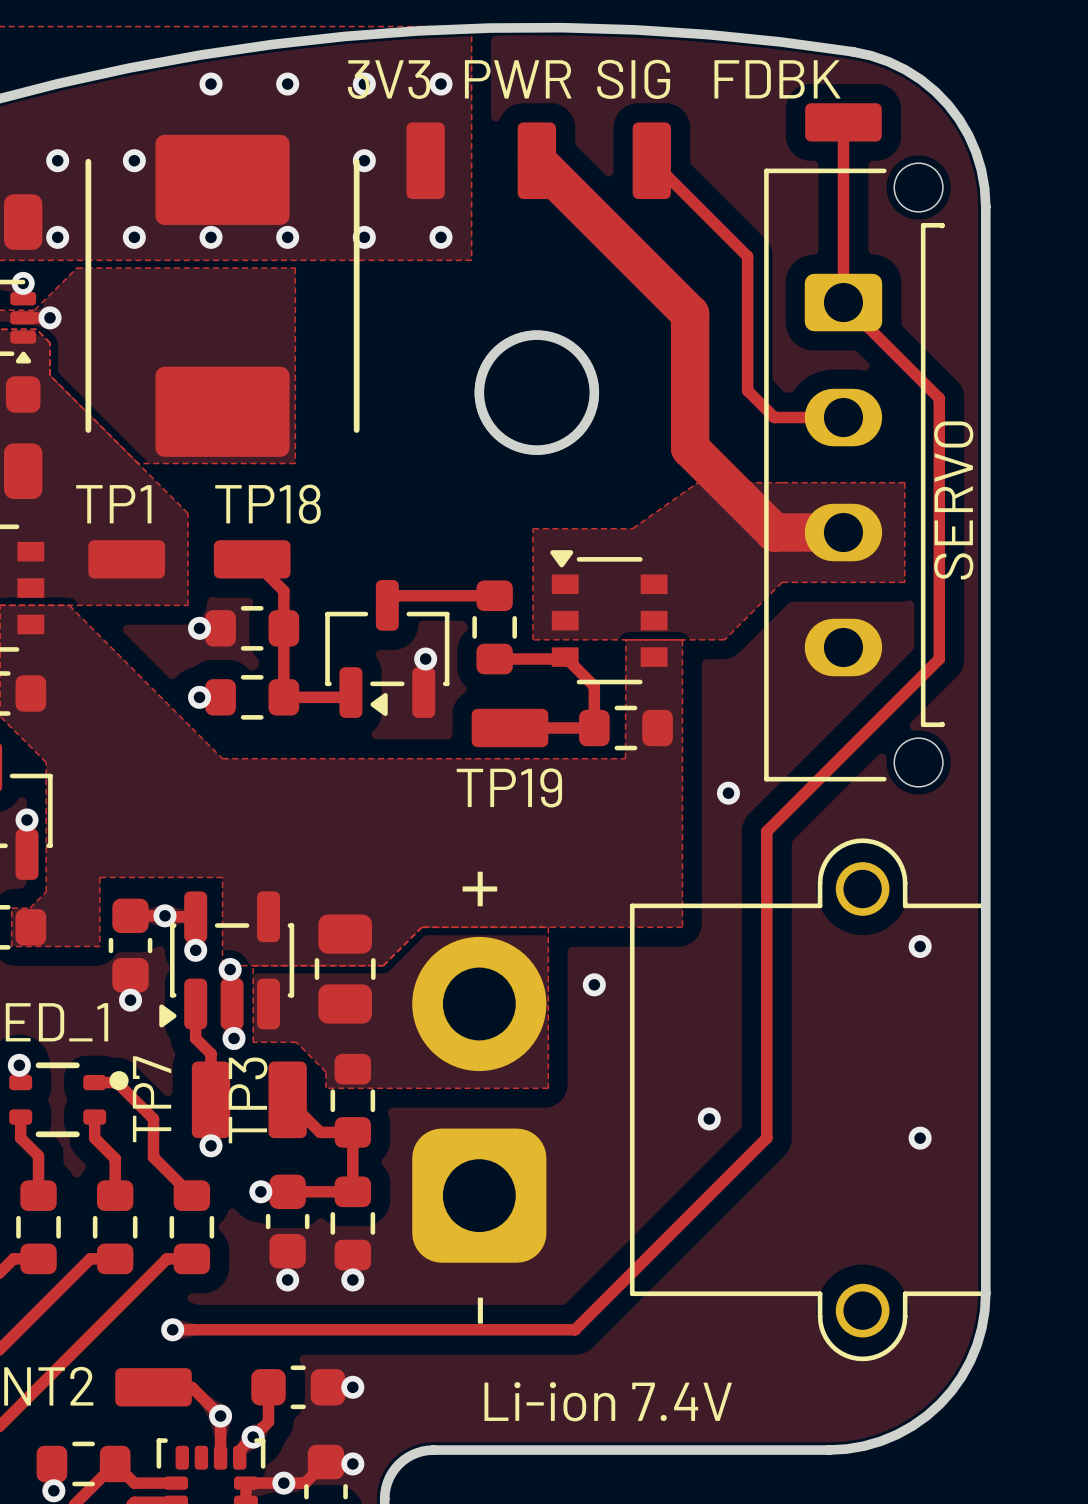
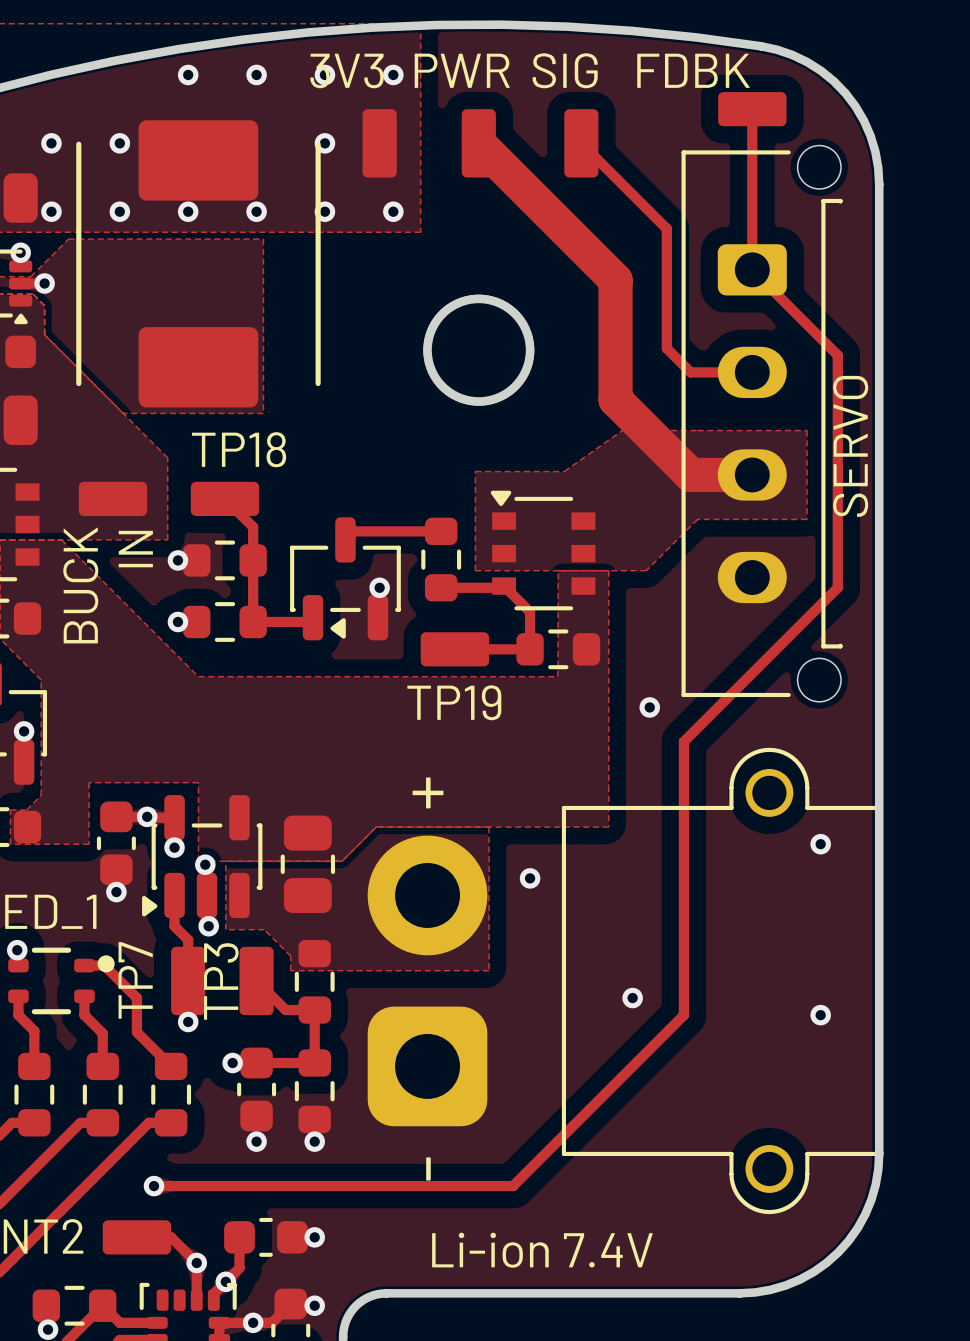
TP1 name: TP1 (113, 504) -> none
text: none -> IN (135, 549)
text: none -> BUCK (80, 585)

